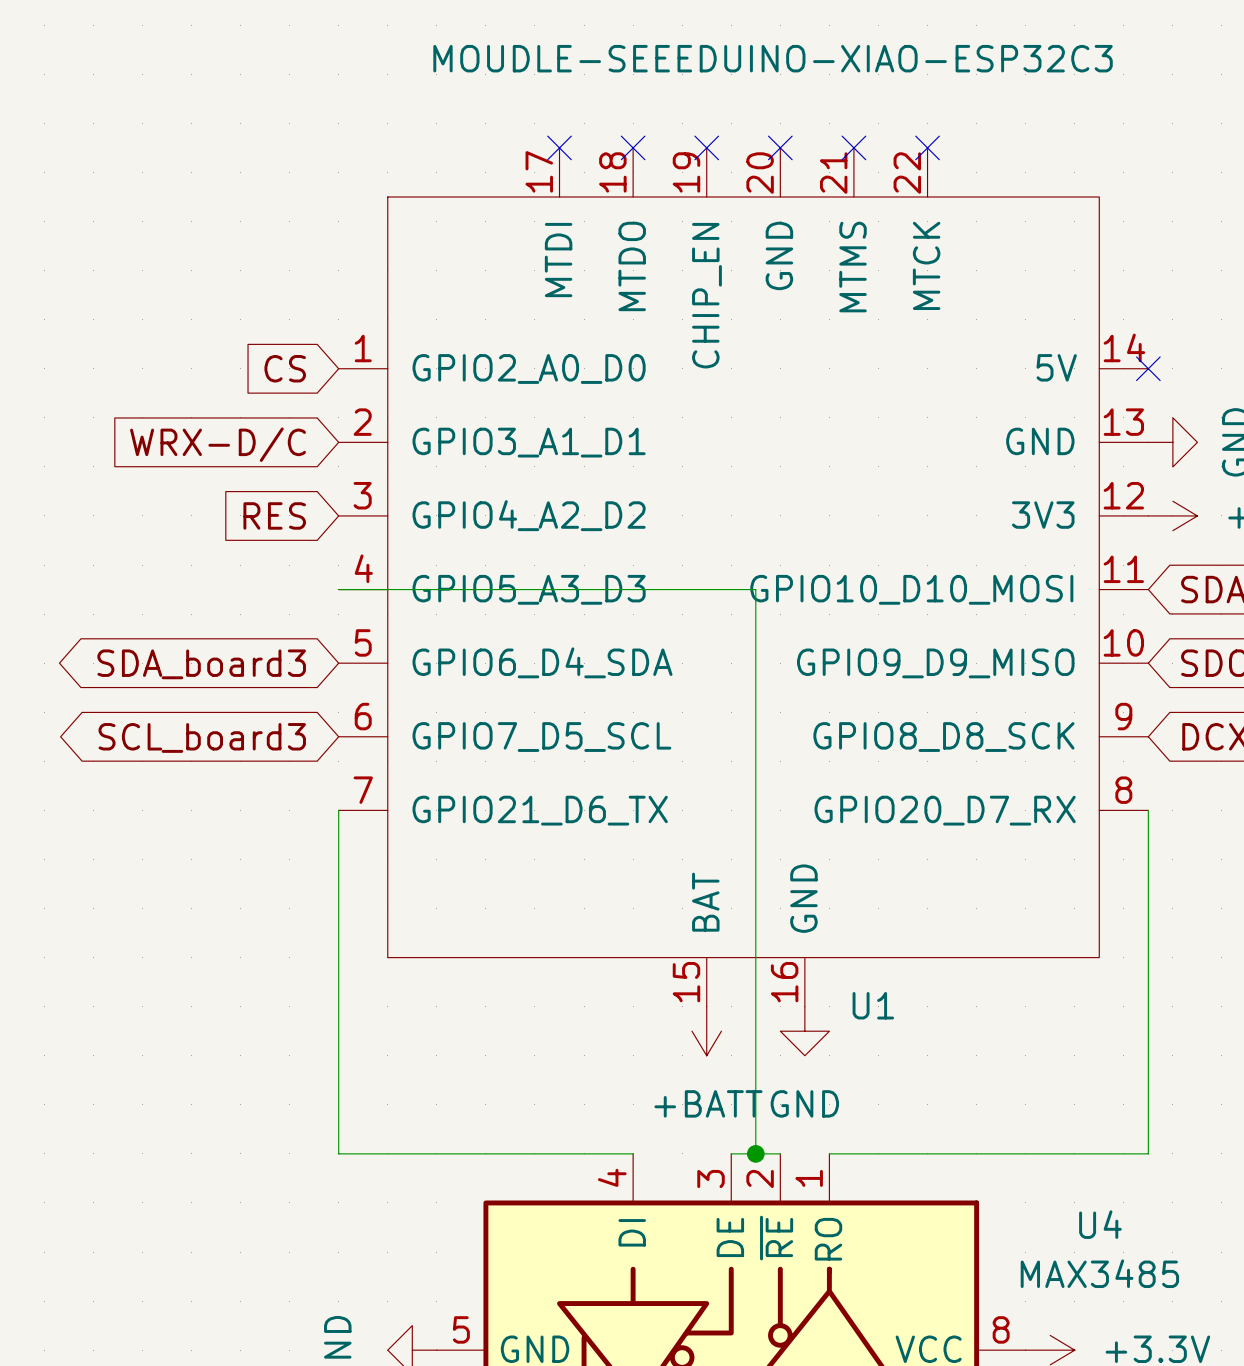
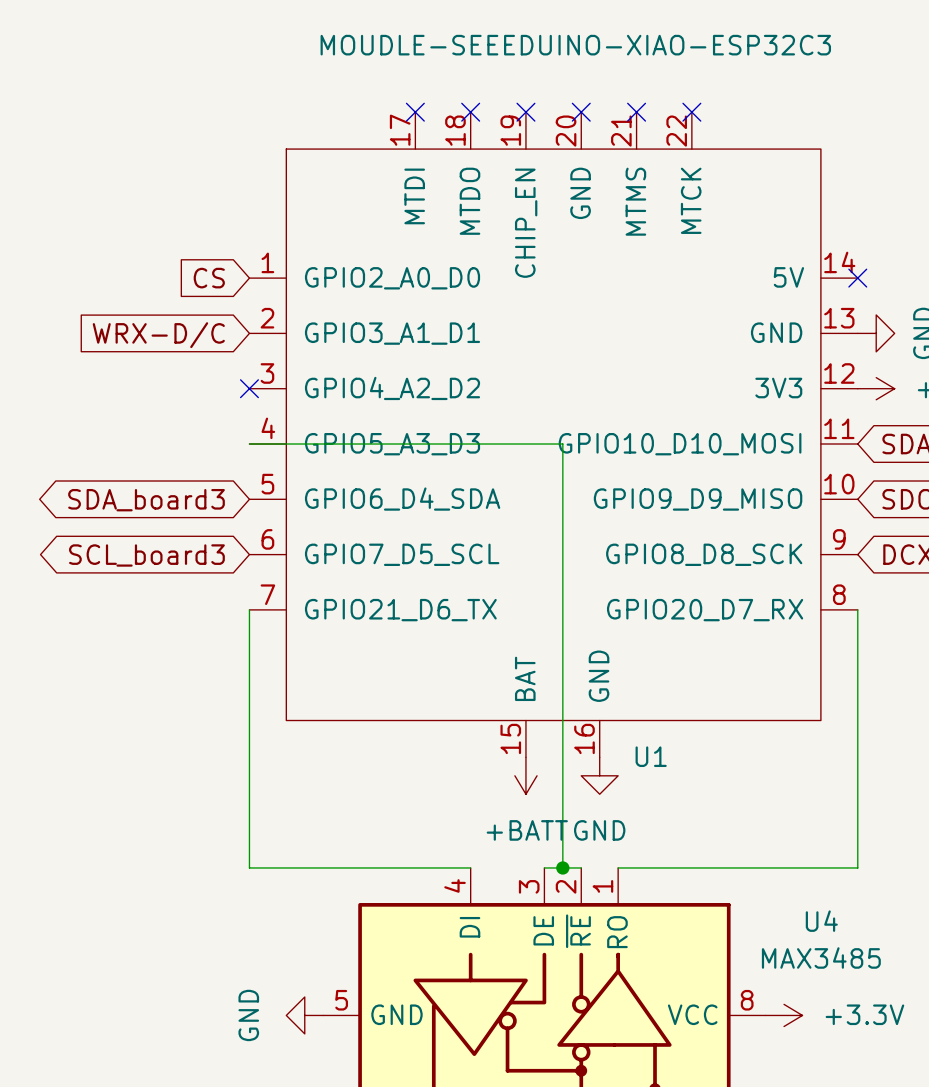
global label: RES (274, 515) -> none
no-connect mark: none -> (249, 388)

